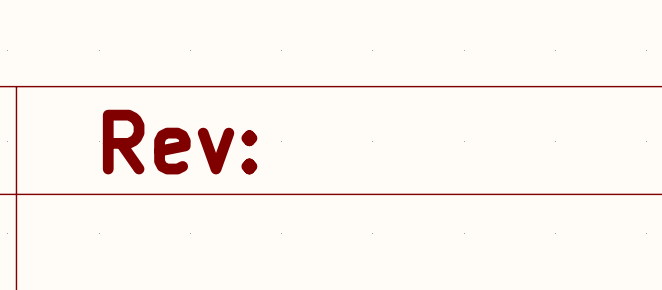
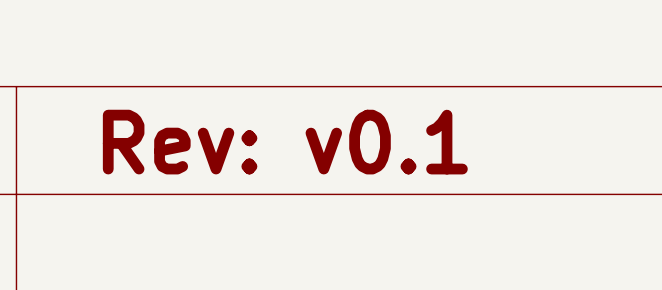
title block: Rev: (180, 142) -> Rev: v0.1 (285, 142)

